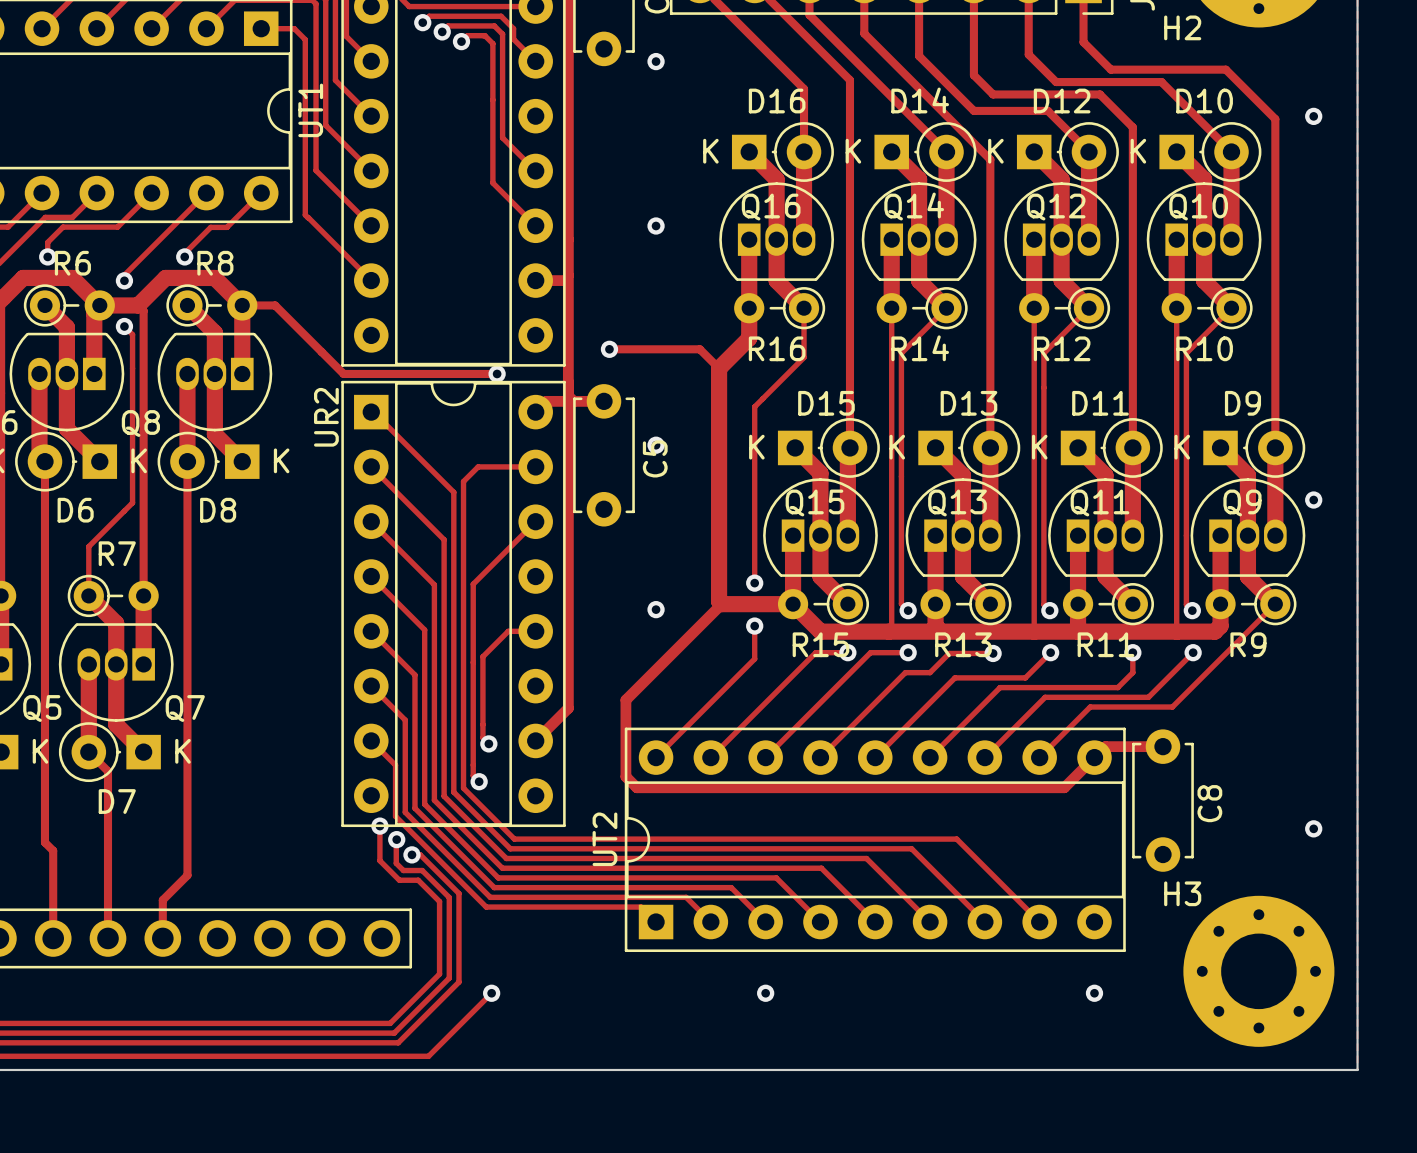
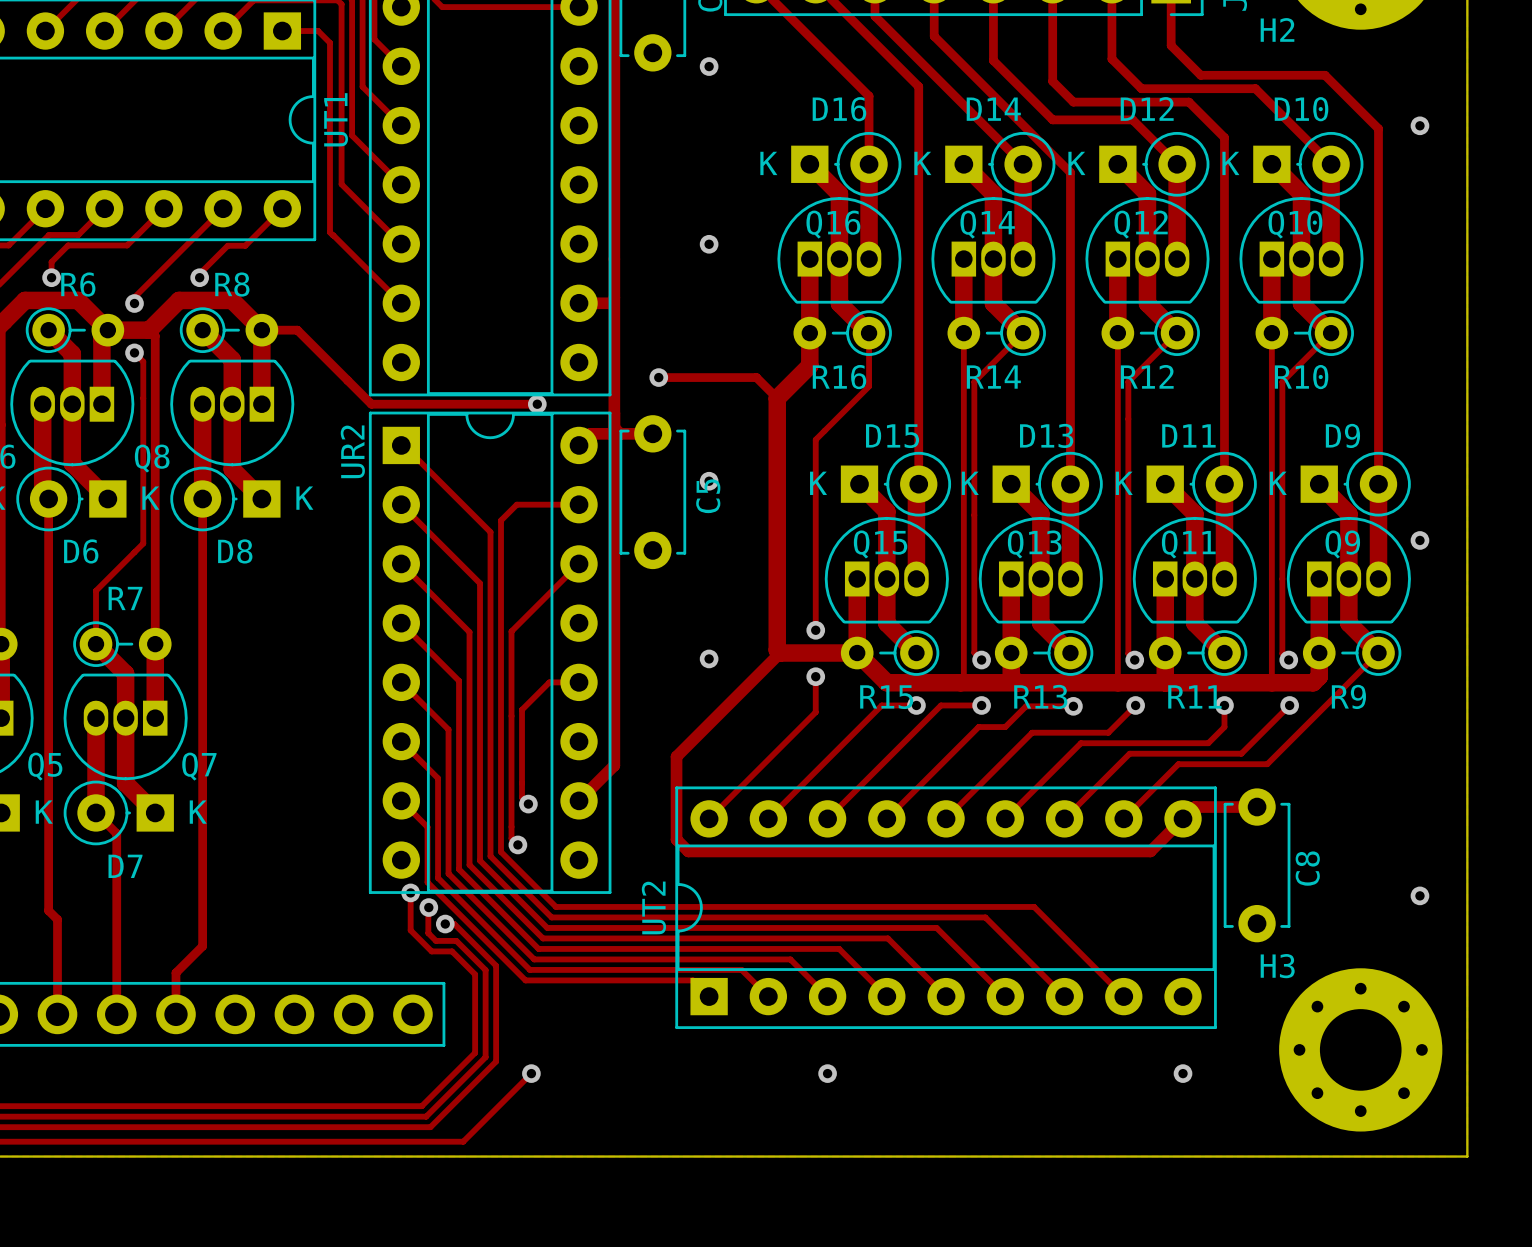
track: (422, 22) (429, 16) (501, 16) (513, 28) (513, 39) (535, 61) -> none
via: (422, 22) -> none
via: (442, 31) -> none
track: (441, 32) (448, 25) (494, 25) (502, 34) (502, 137) (535, 170) -> none
track: (461, 41) (467, 35) (484, 35) (492, 43) (492, 182) (535, 225) -> none
via: (461, 41) -> none

